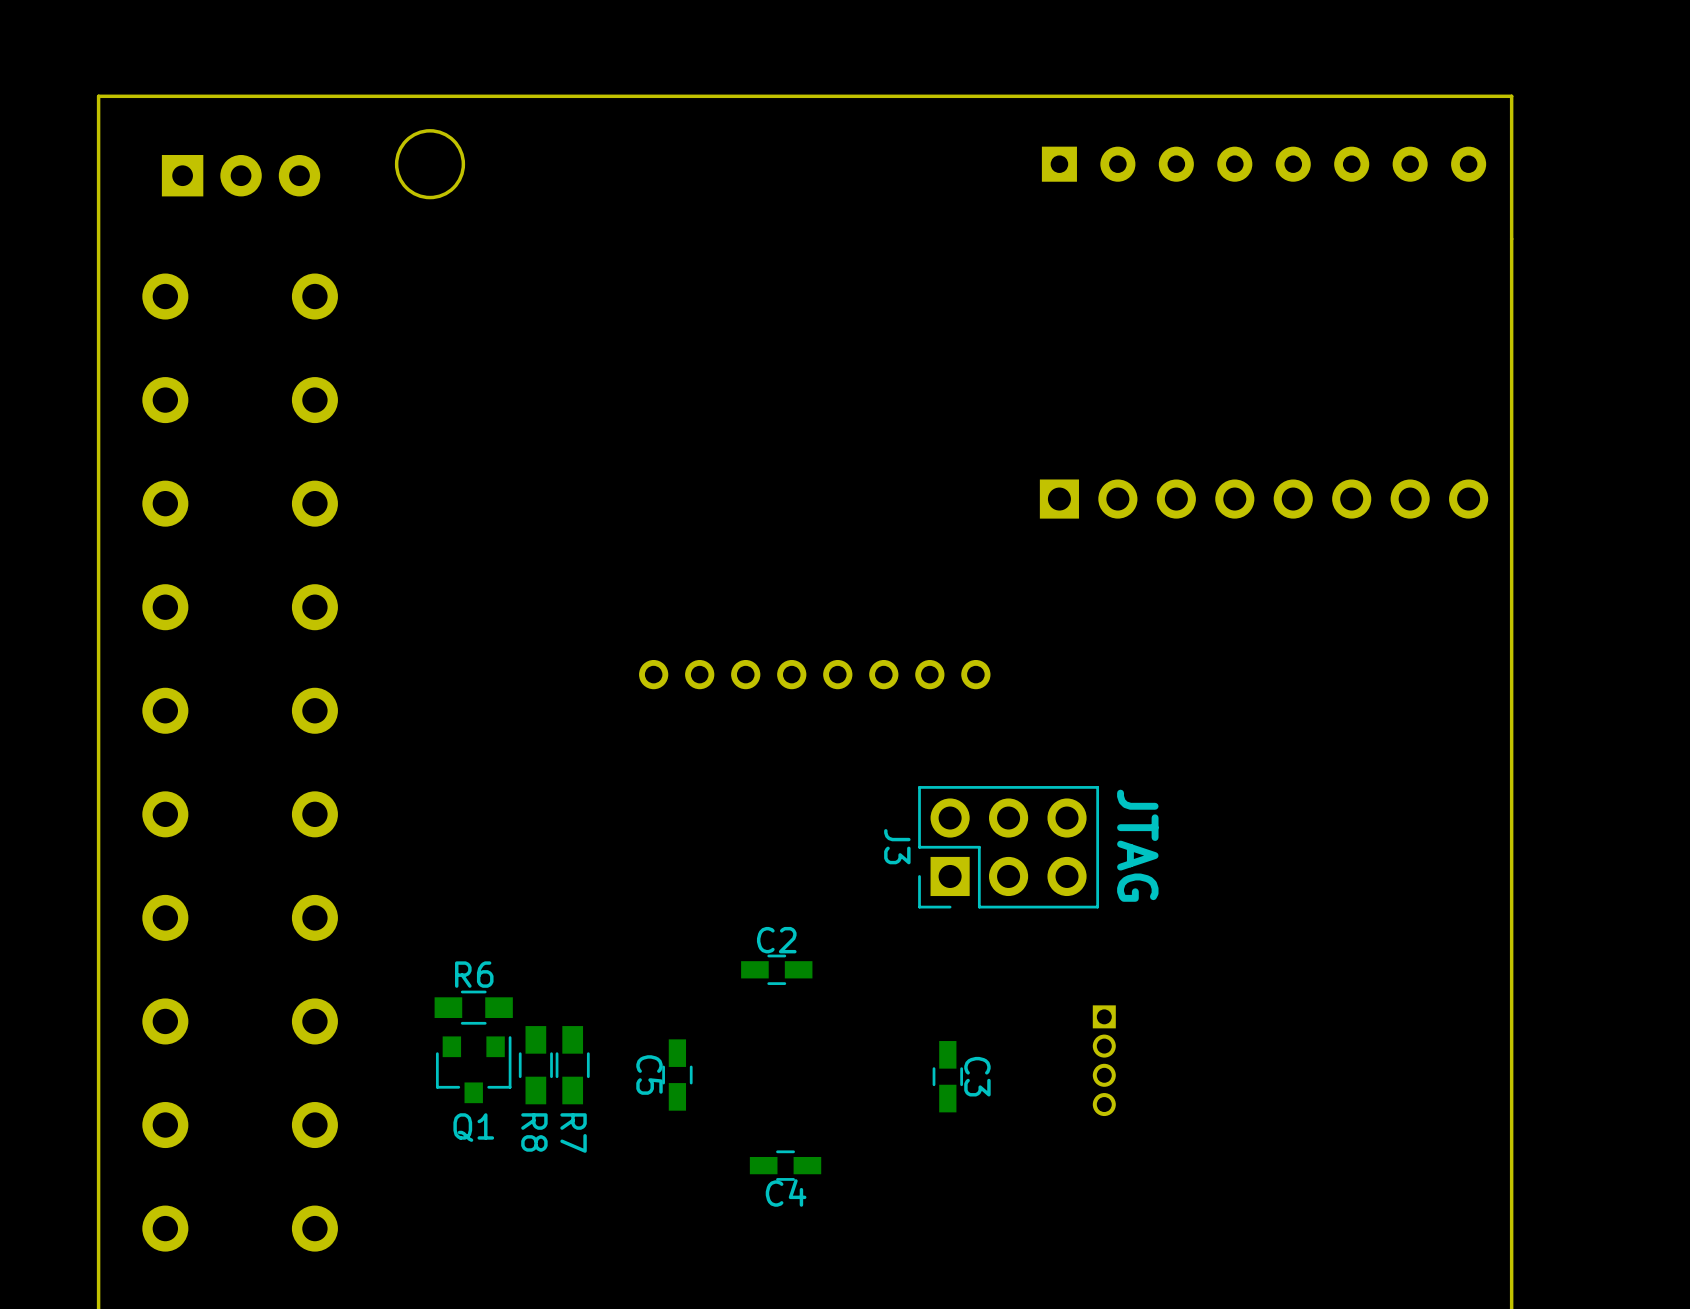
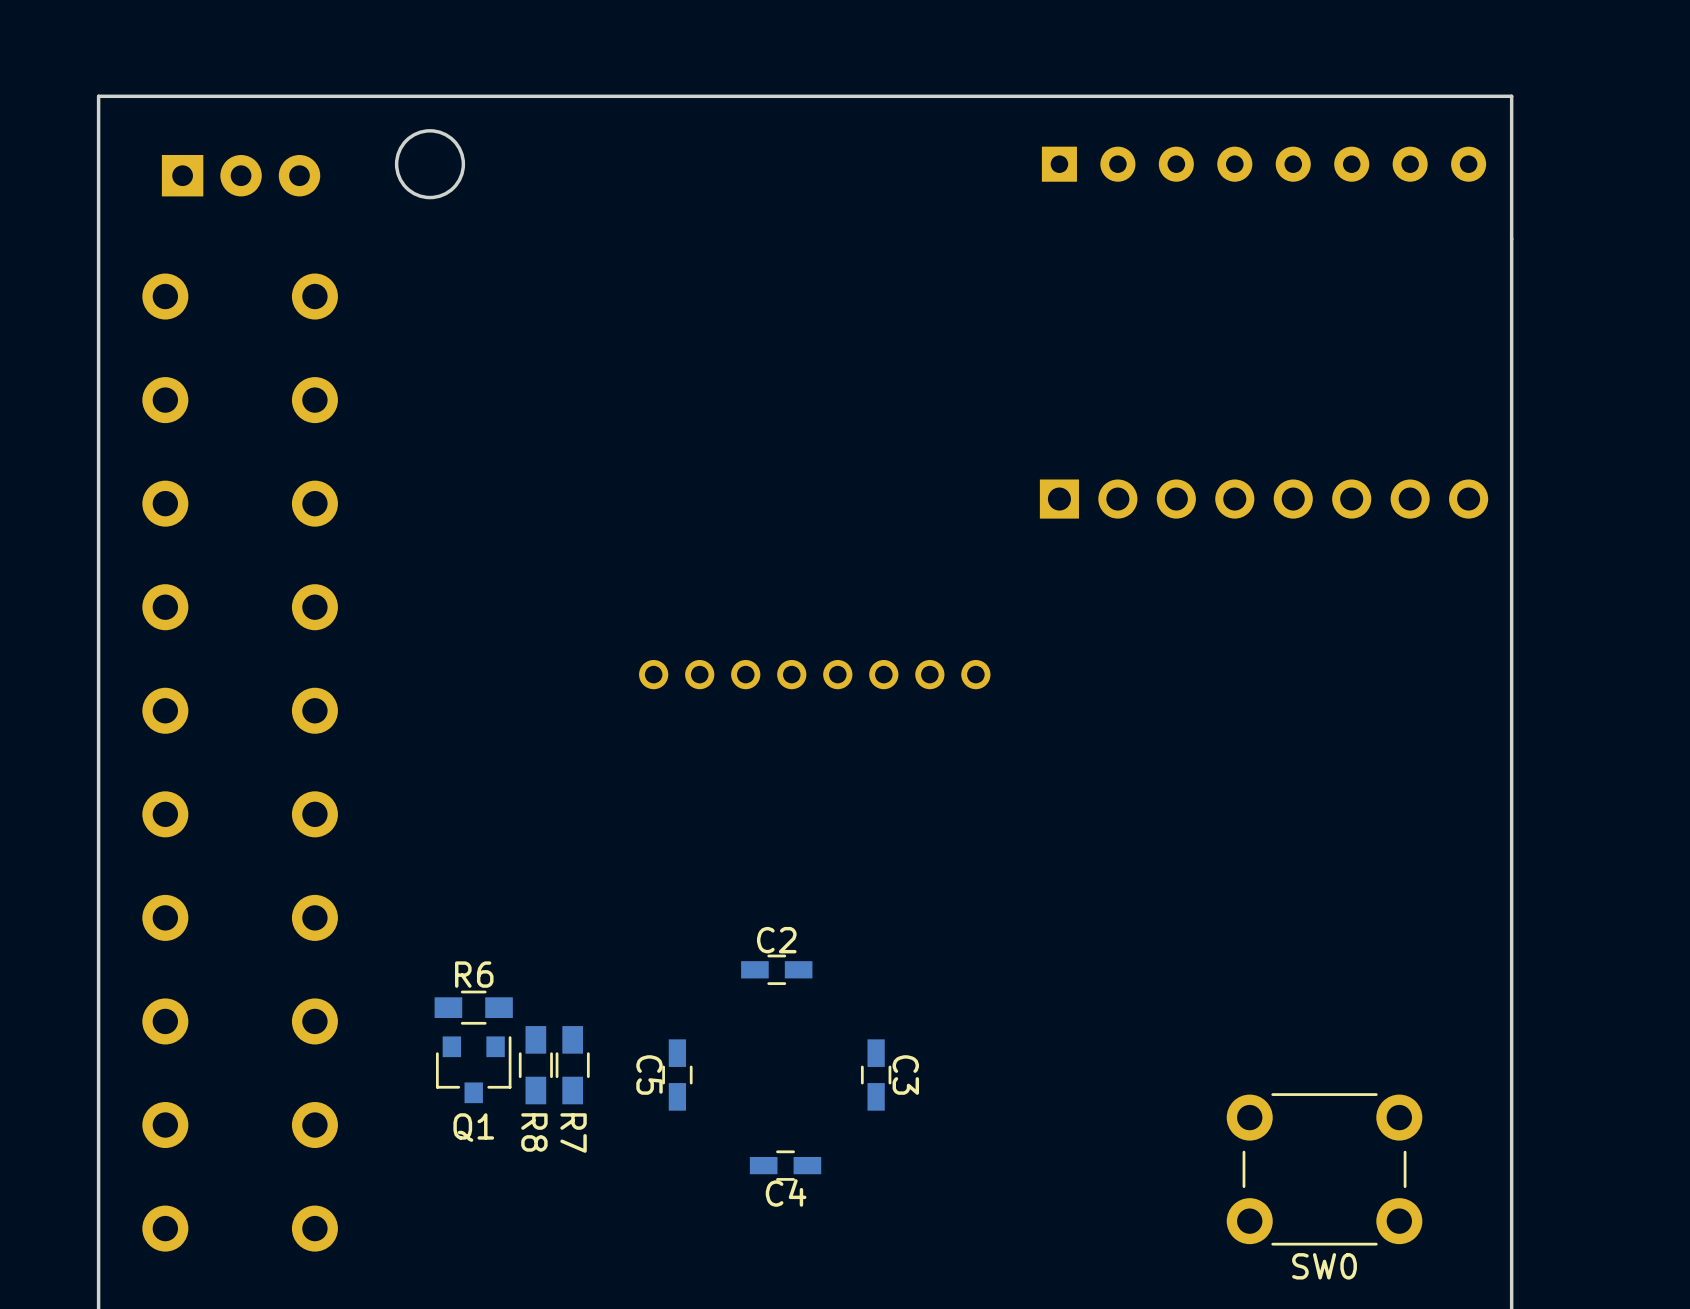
text: JTAG (1137, 845) -> none
J3: (1008, 847) -> none
part: (1104, 1060) -> none
C3 position: (947, 1076) -> (876, 1075)
SW0: none -> (1324, 1169)

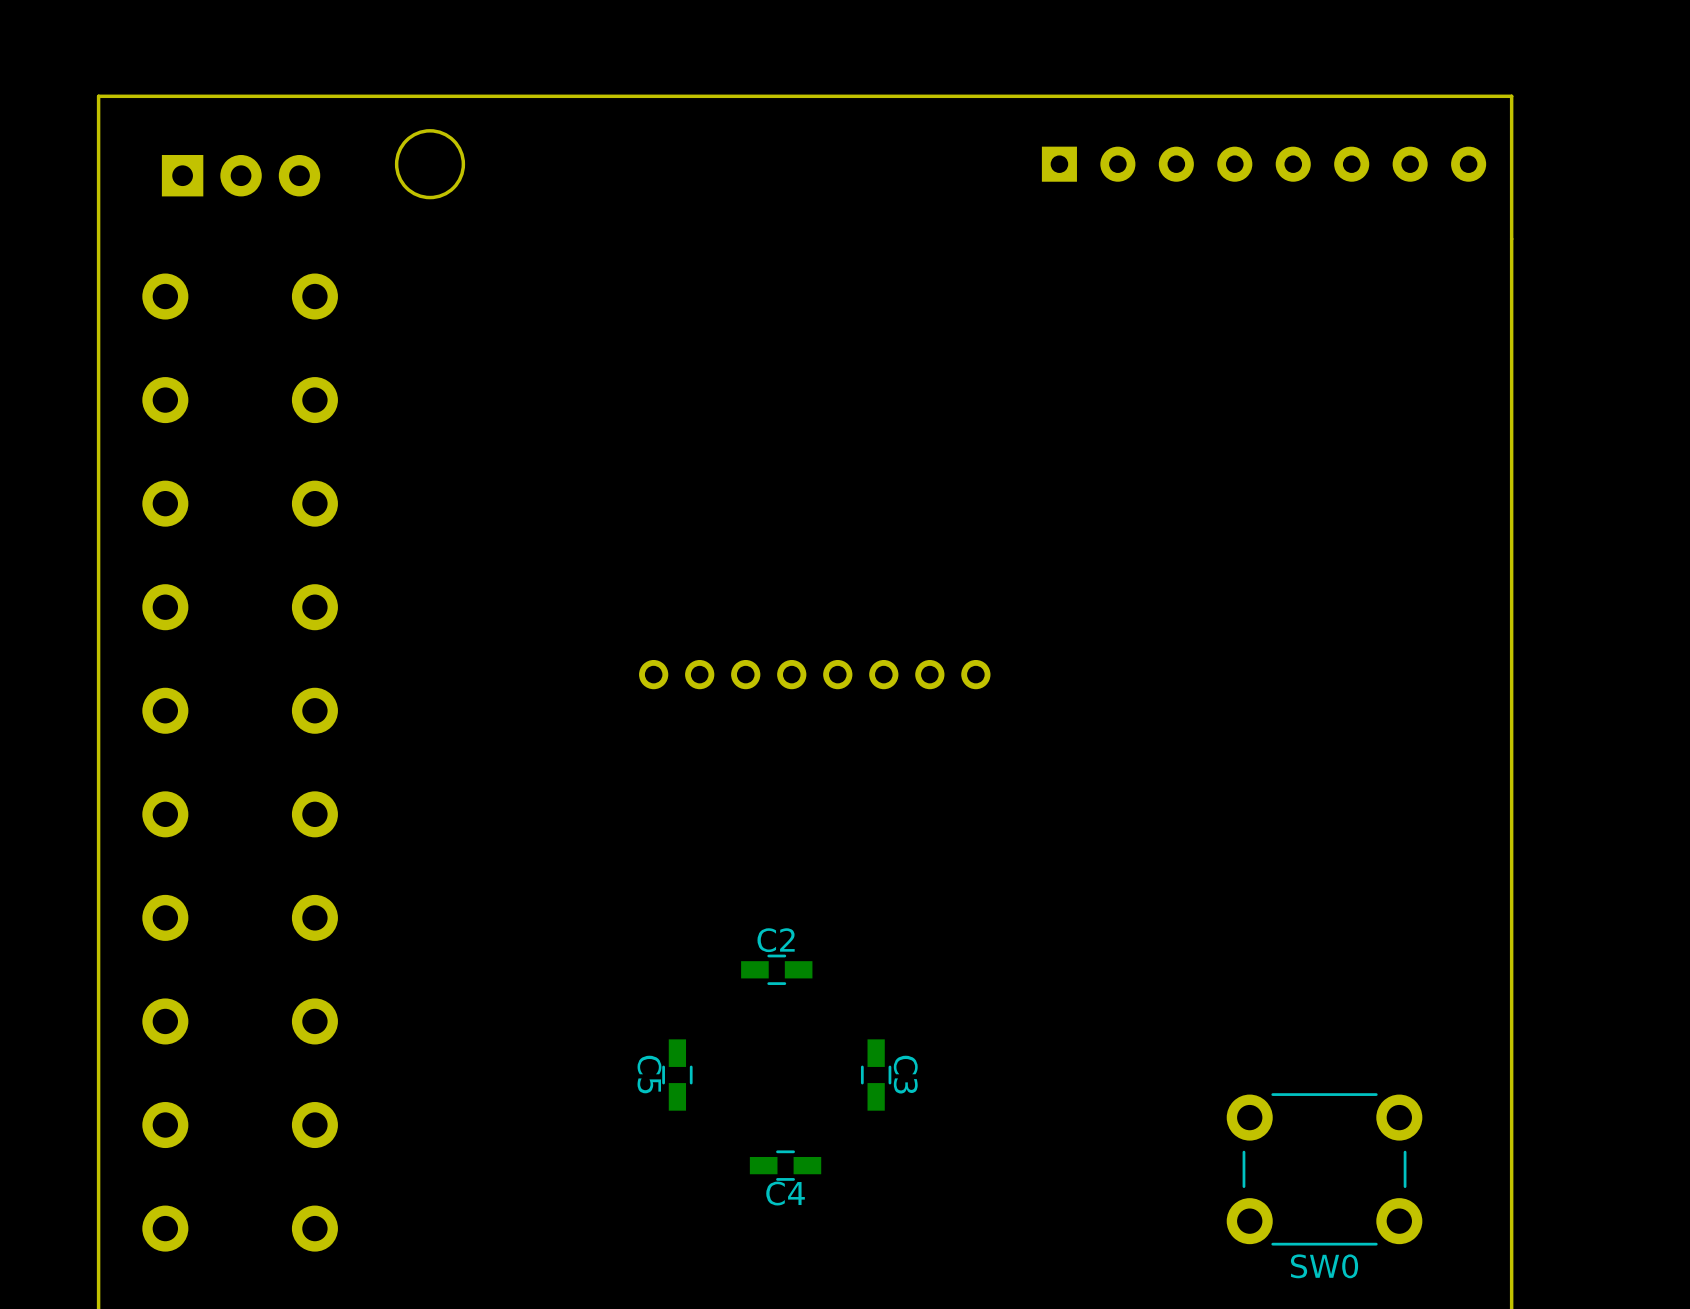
part: (1264, 499) -> none
R6: (473, 1007) -> none
R8: (535, 1065) -> none
R7: (572, 1065) -> none
Q1: (473, 1069) -> none

